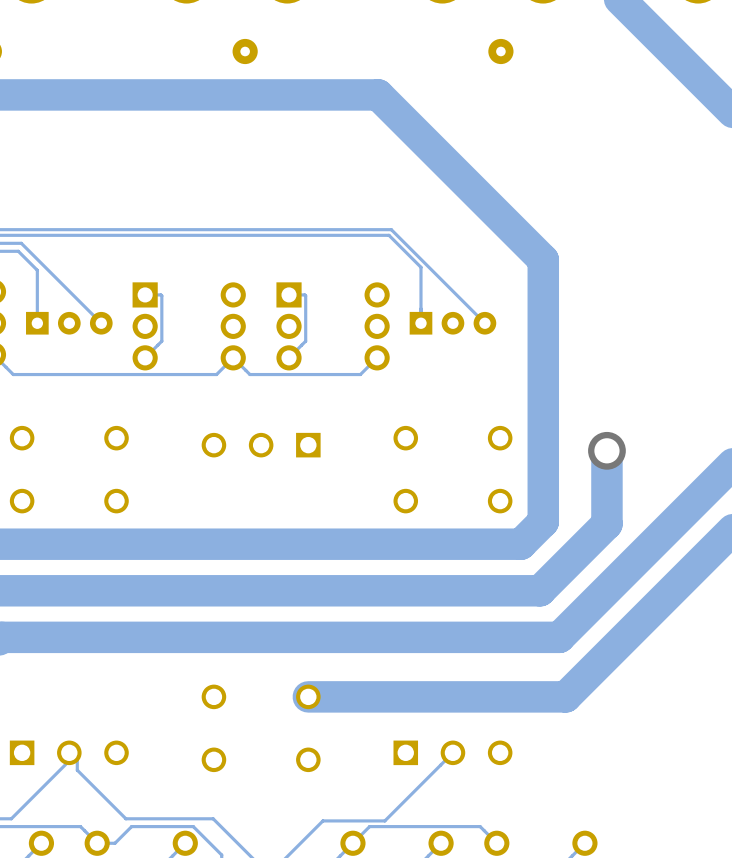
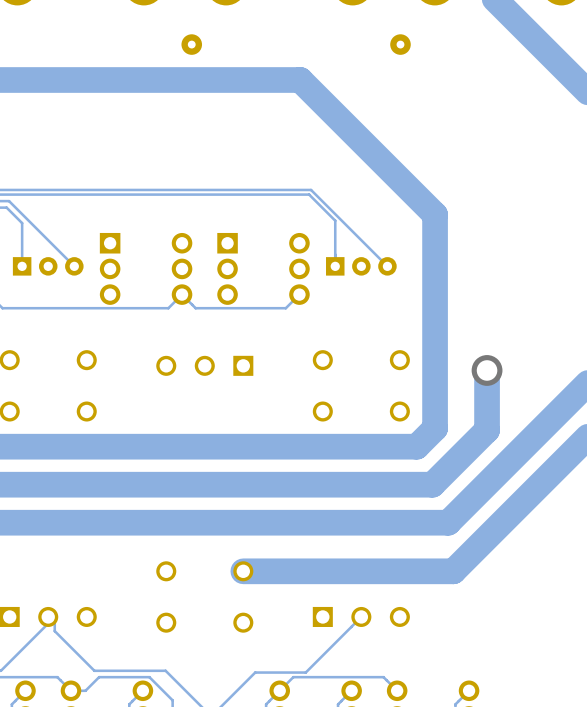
track: (145, 294) (161, 295) (161, 341) (145, 357) -> none
track: (289, 294) (305, 295) (305, 341) (289, 357) -> none

